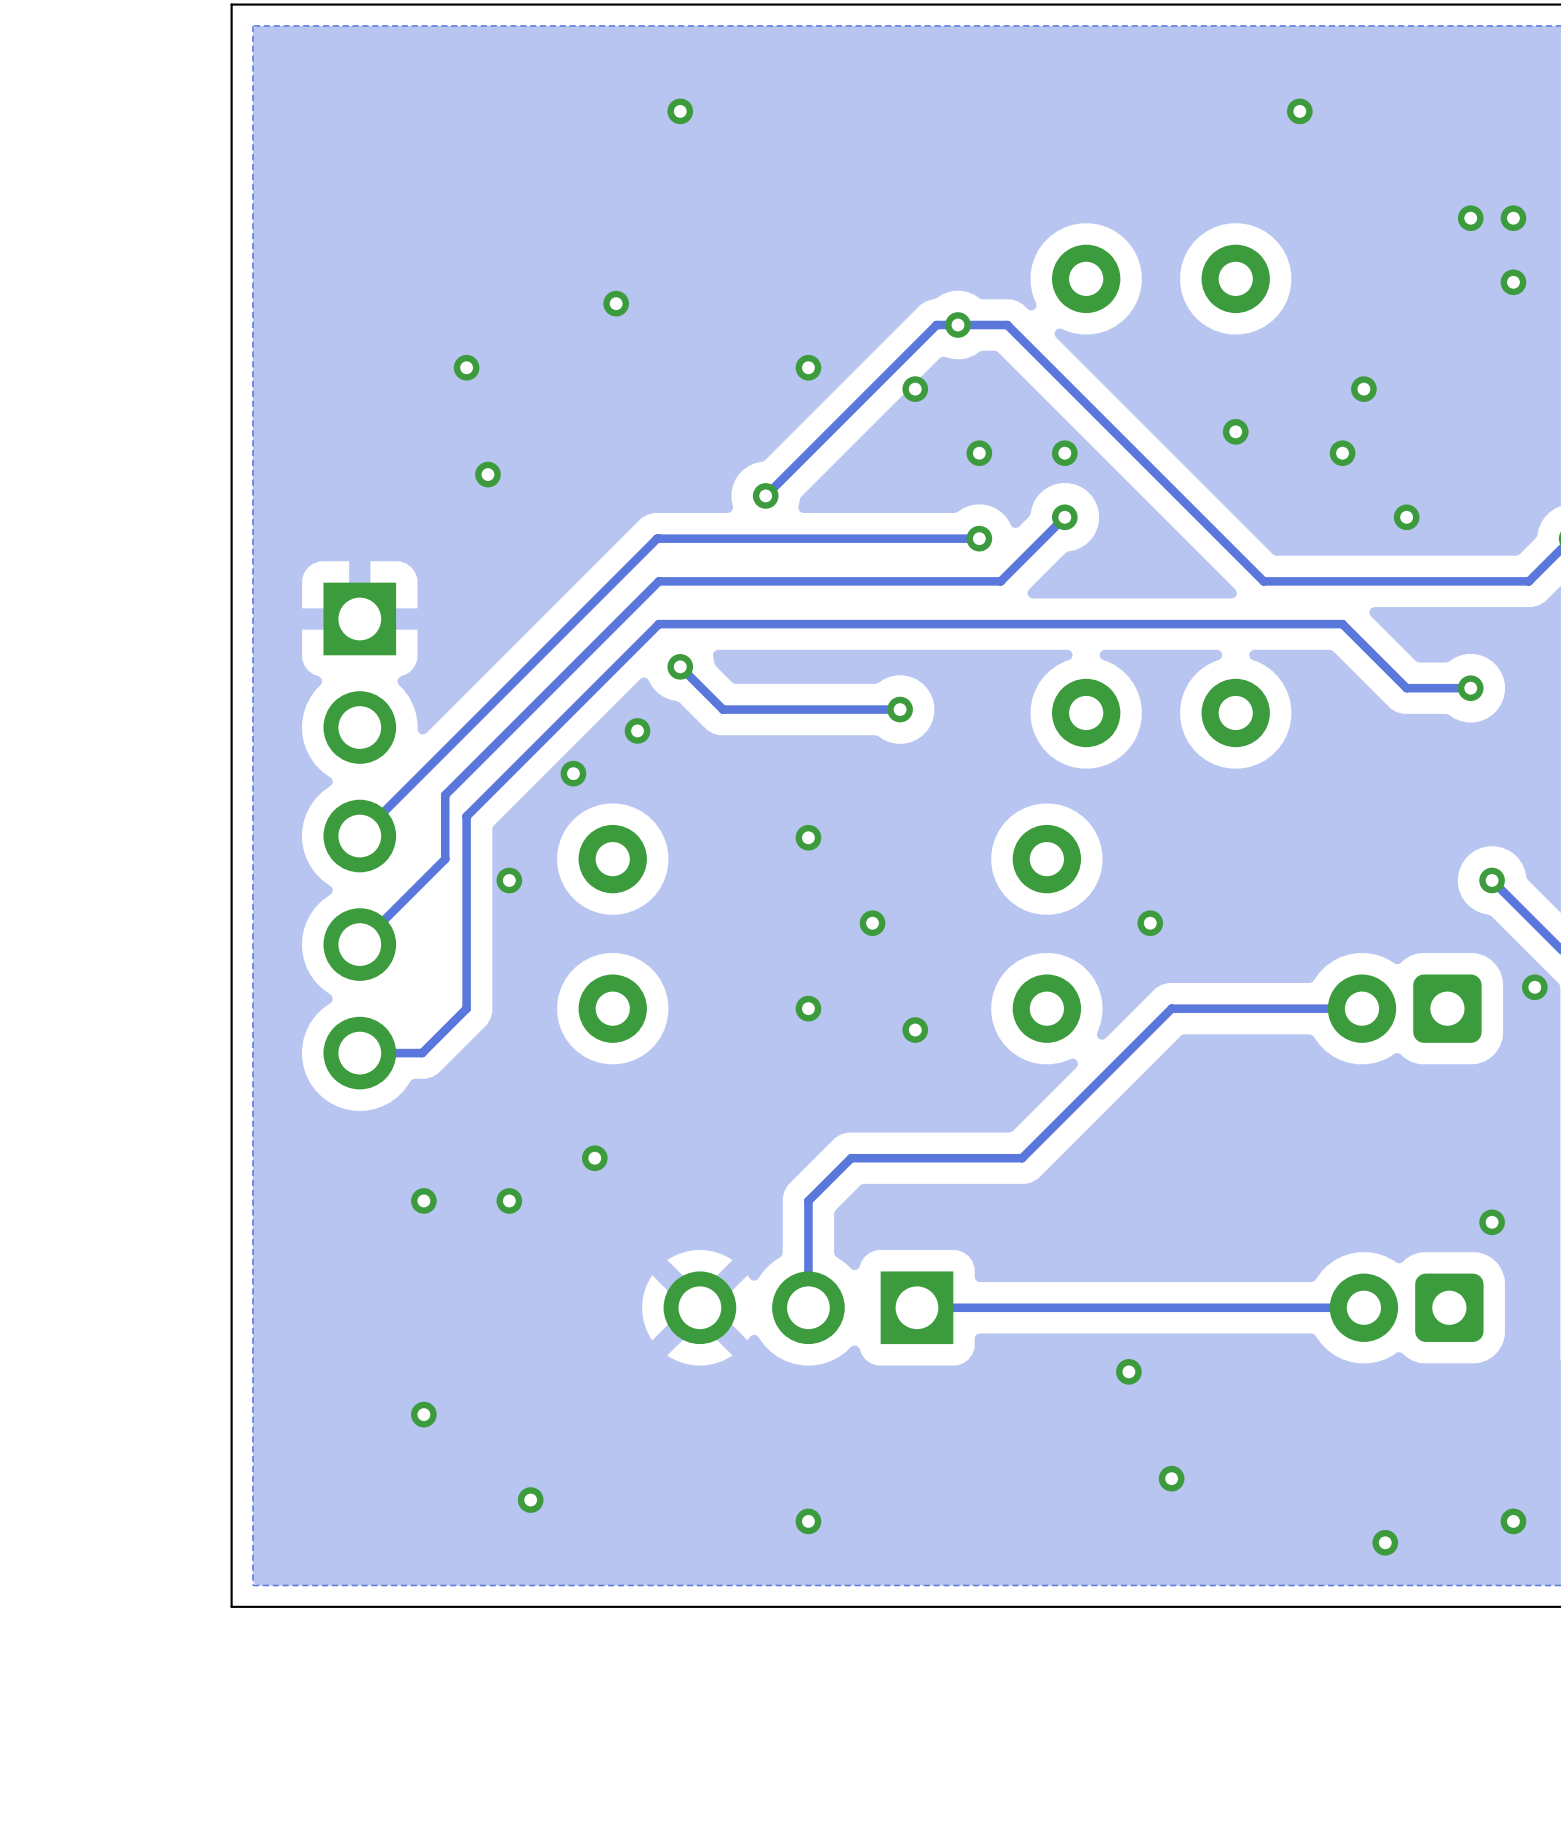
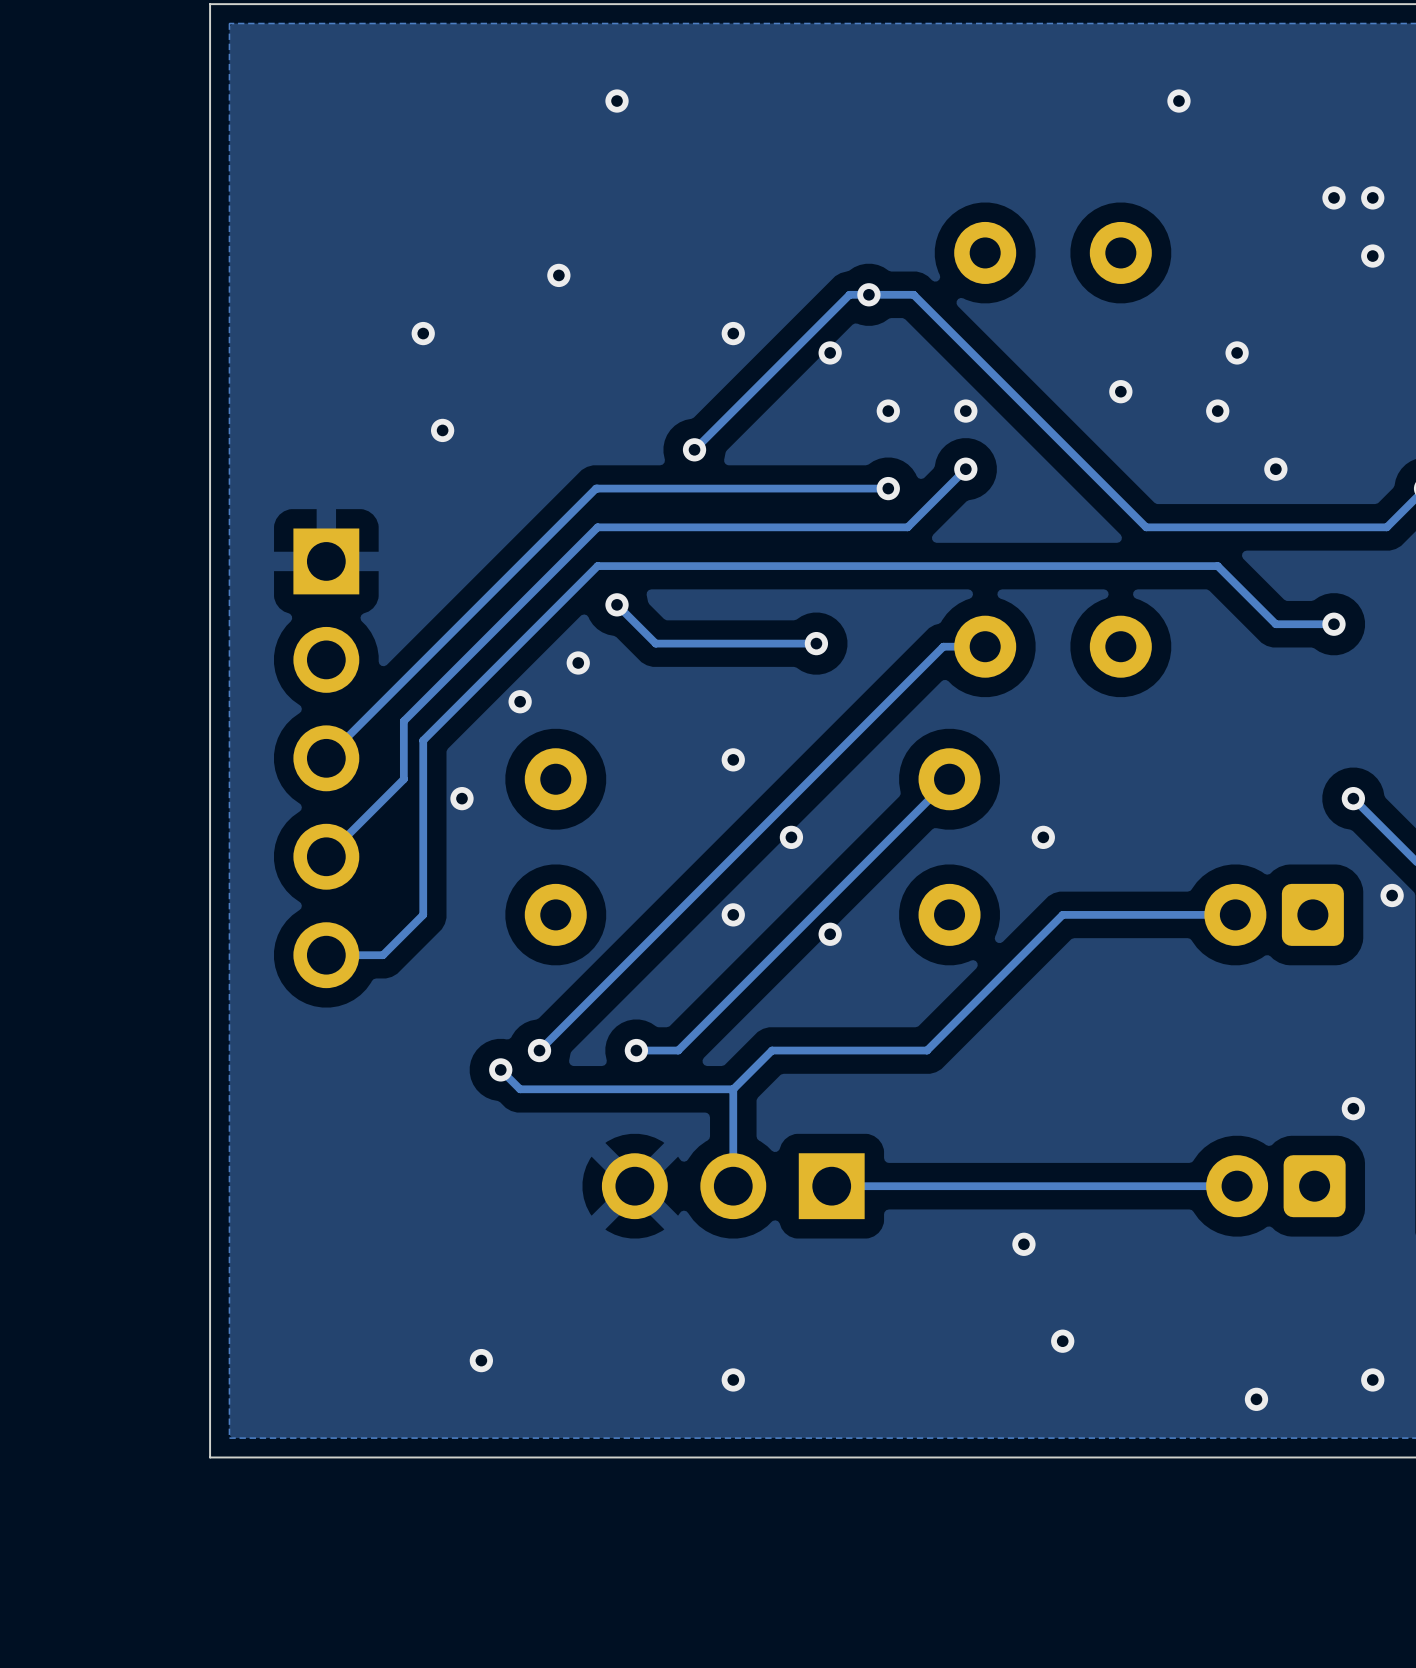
track: none -> (985, 646) (943, 646) (539, 1050)
track: none -> (949, 779) (678, 1050) (636, 1050)
via: none -> (636, 1050)
track: none -> (500, 1069) (520, 1089) (733, 1089)
via: (423, 1200) -> none
via position: (509, 1200) -> (500, 1069)
via: (423, 1414) -> none

